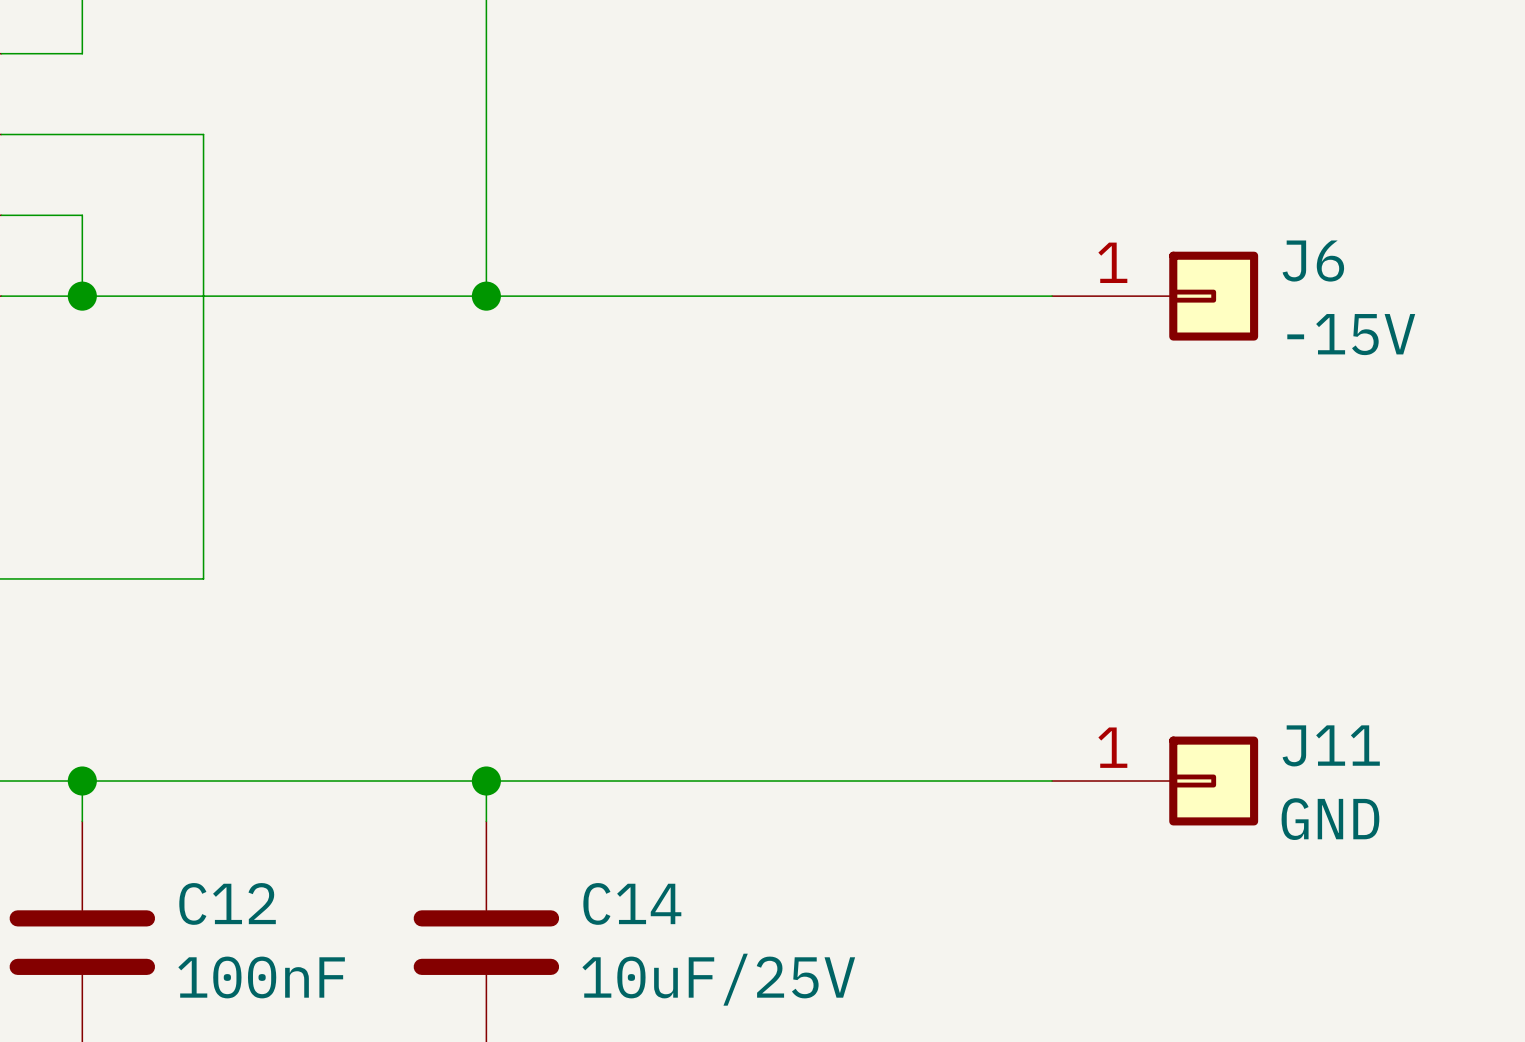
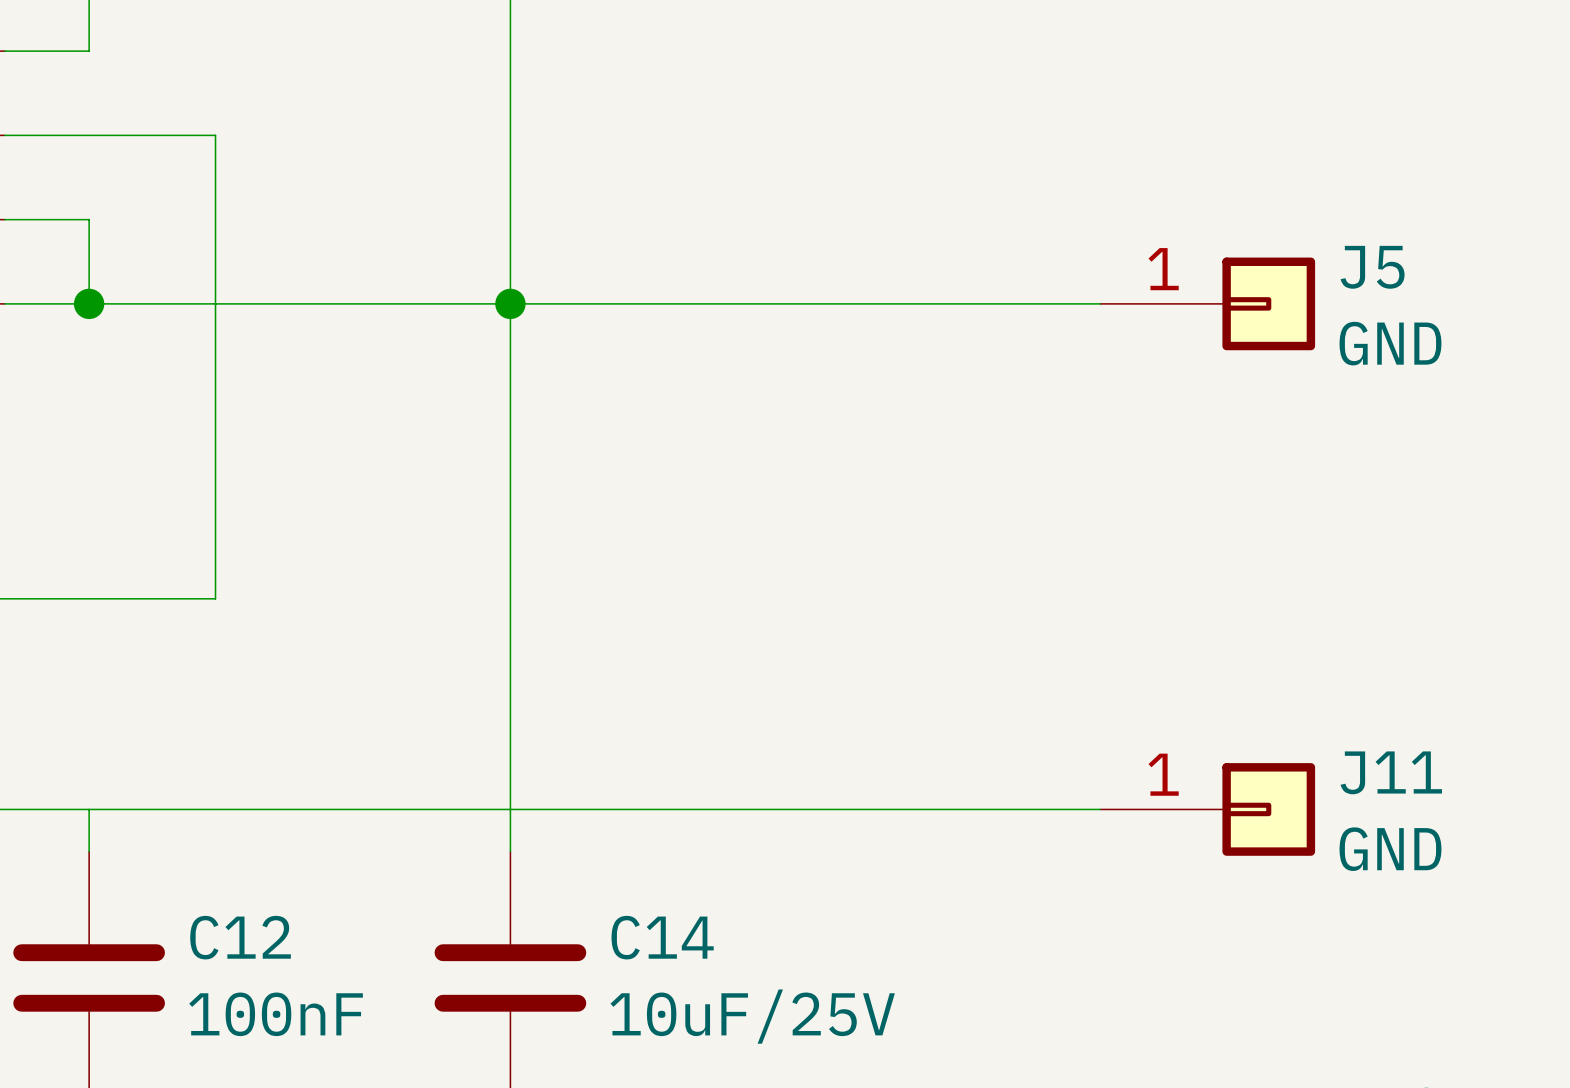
J6 name: J6 (1313, 261) -> J5 (1372, 267)
wire: none -> (510, 303) (510, 809)
J6 value: -15V (1351, 334) -> GND (1390, 343)
junction: (82, 781) -> none
junction: (486, 781) -> none

